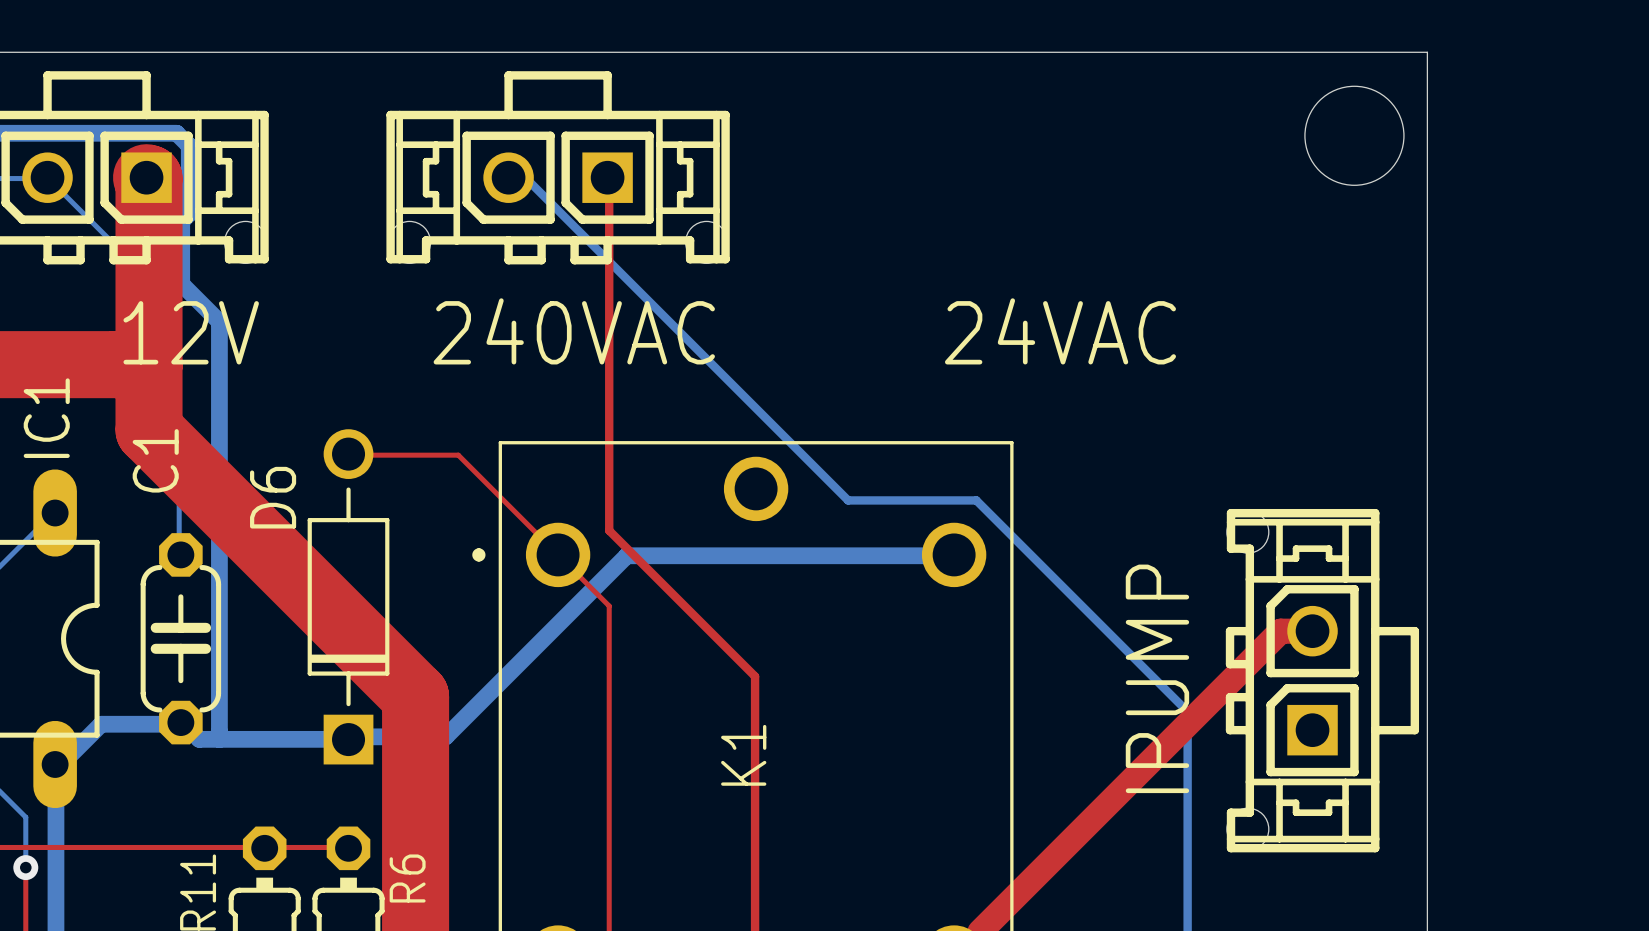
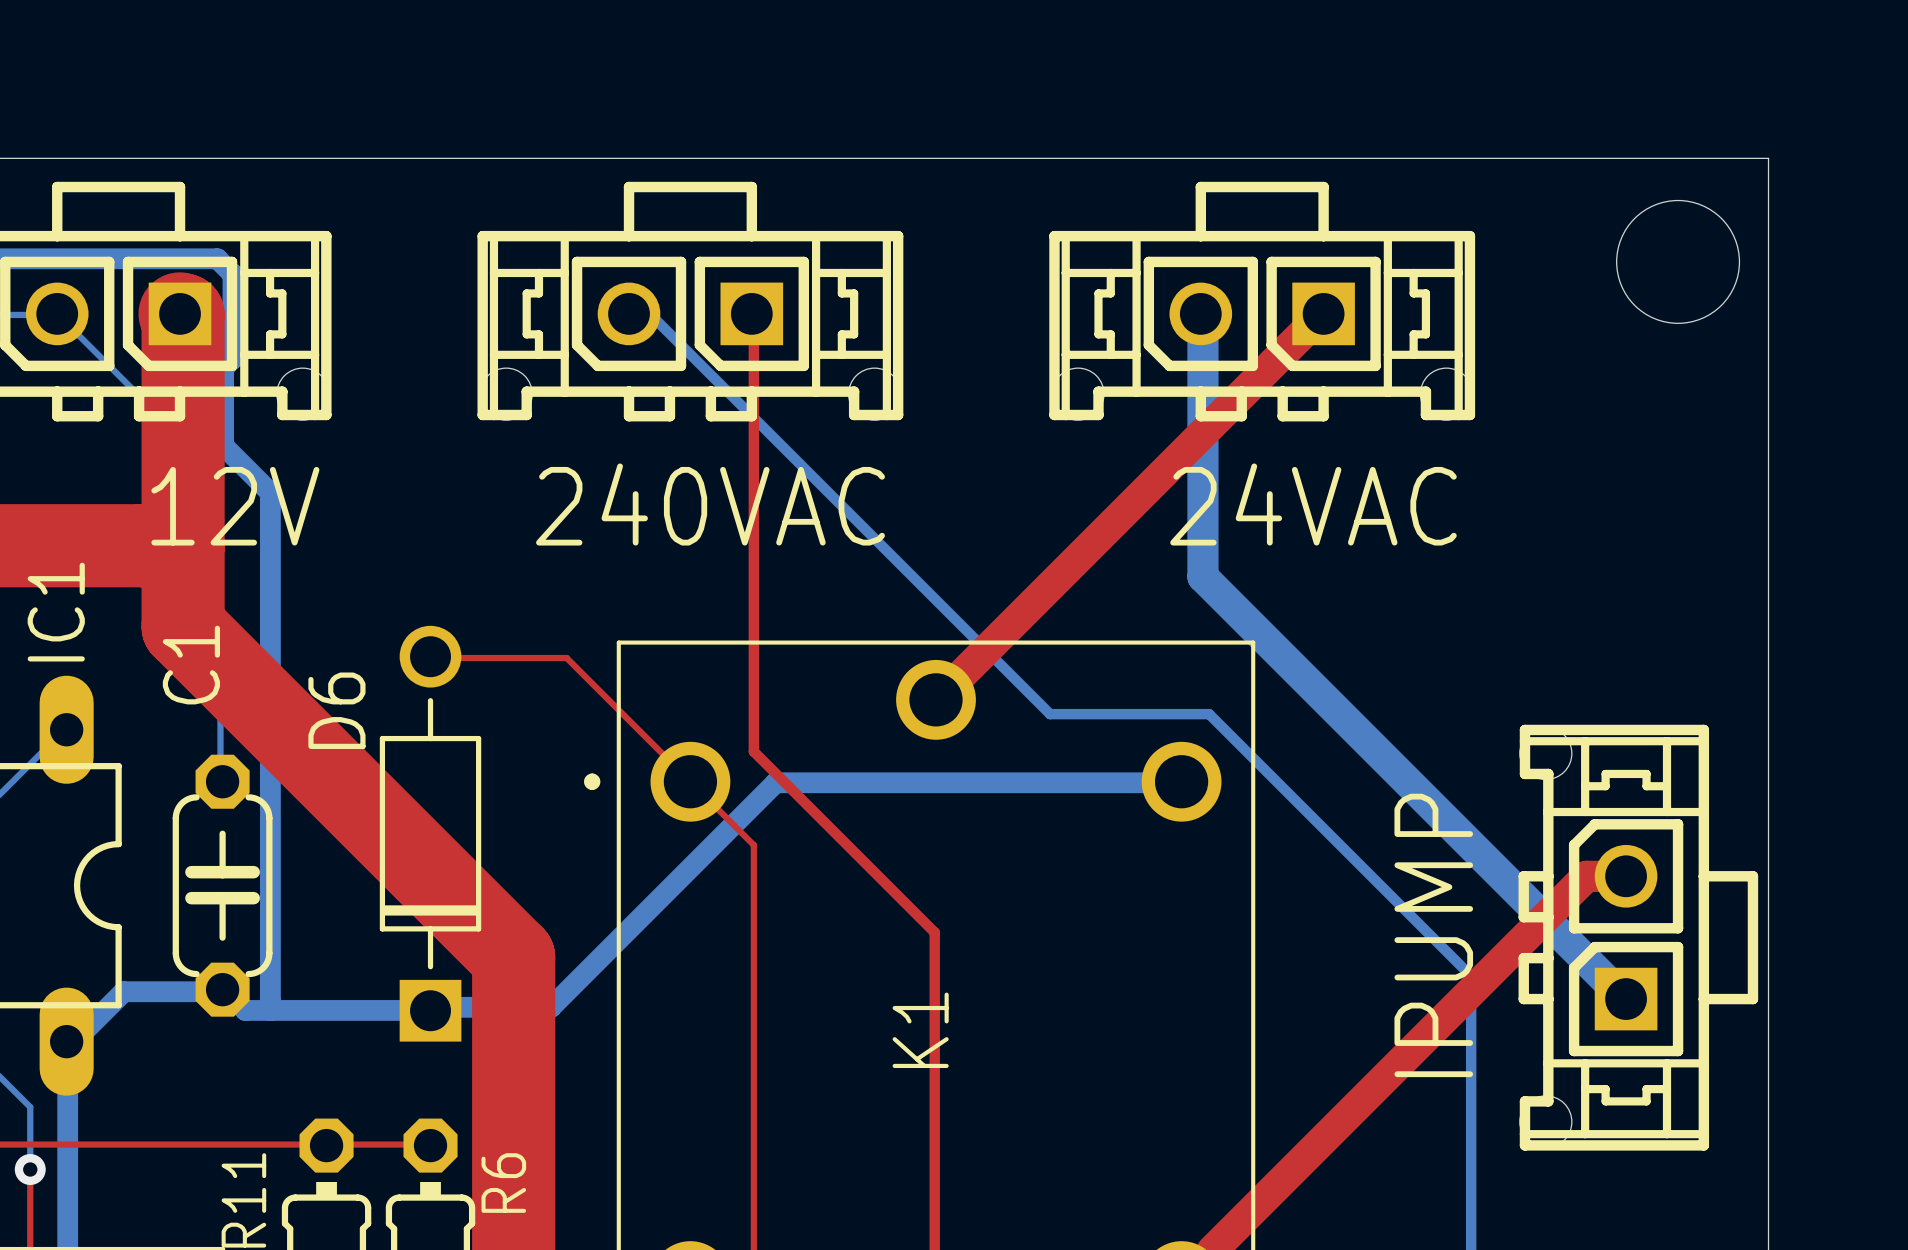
part: none -> (1262, 301)
bottom track: none -> (1200, 313) (1202, 314) (1202, 576) (1626, 999)
top track: none -> (1323, 313) (936, 699)

